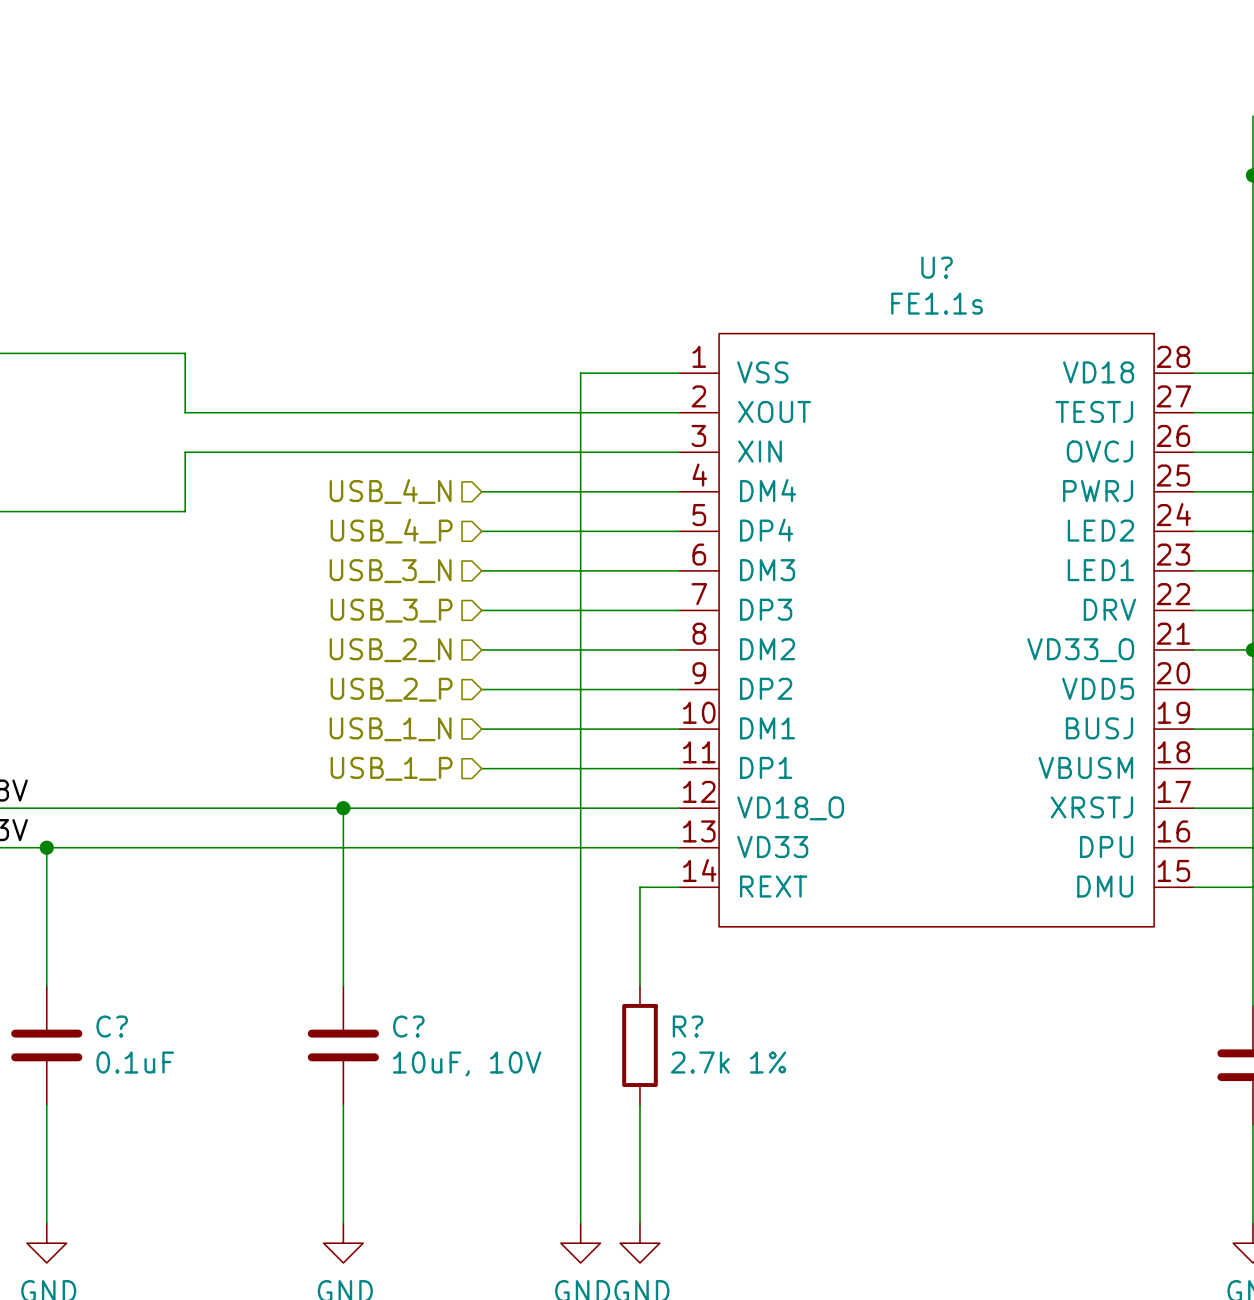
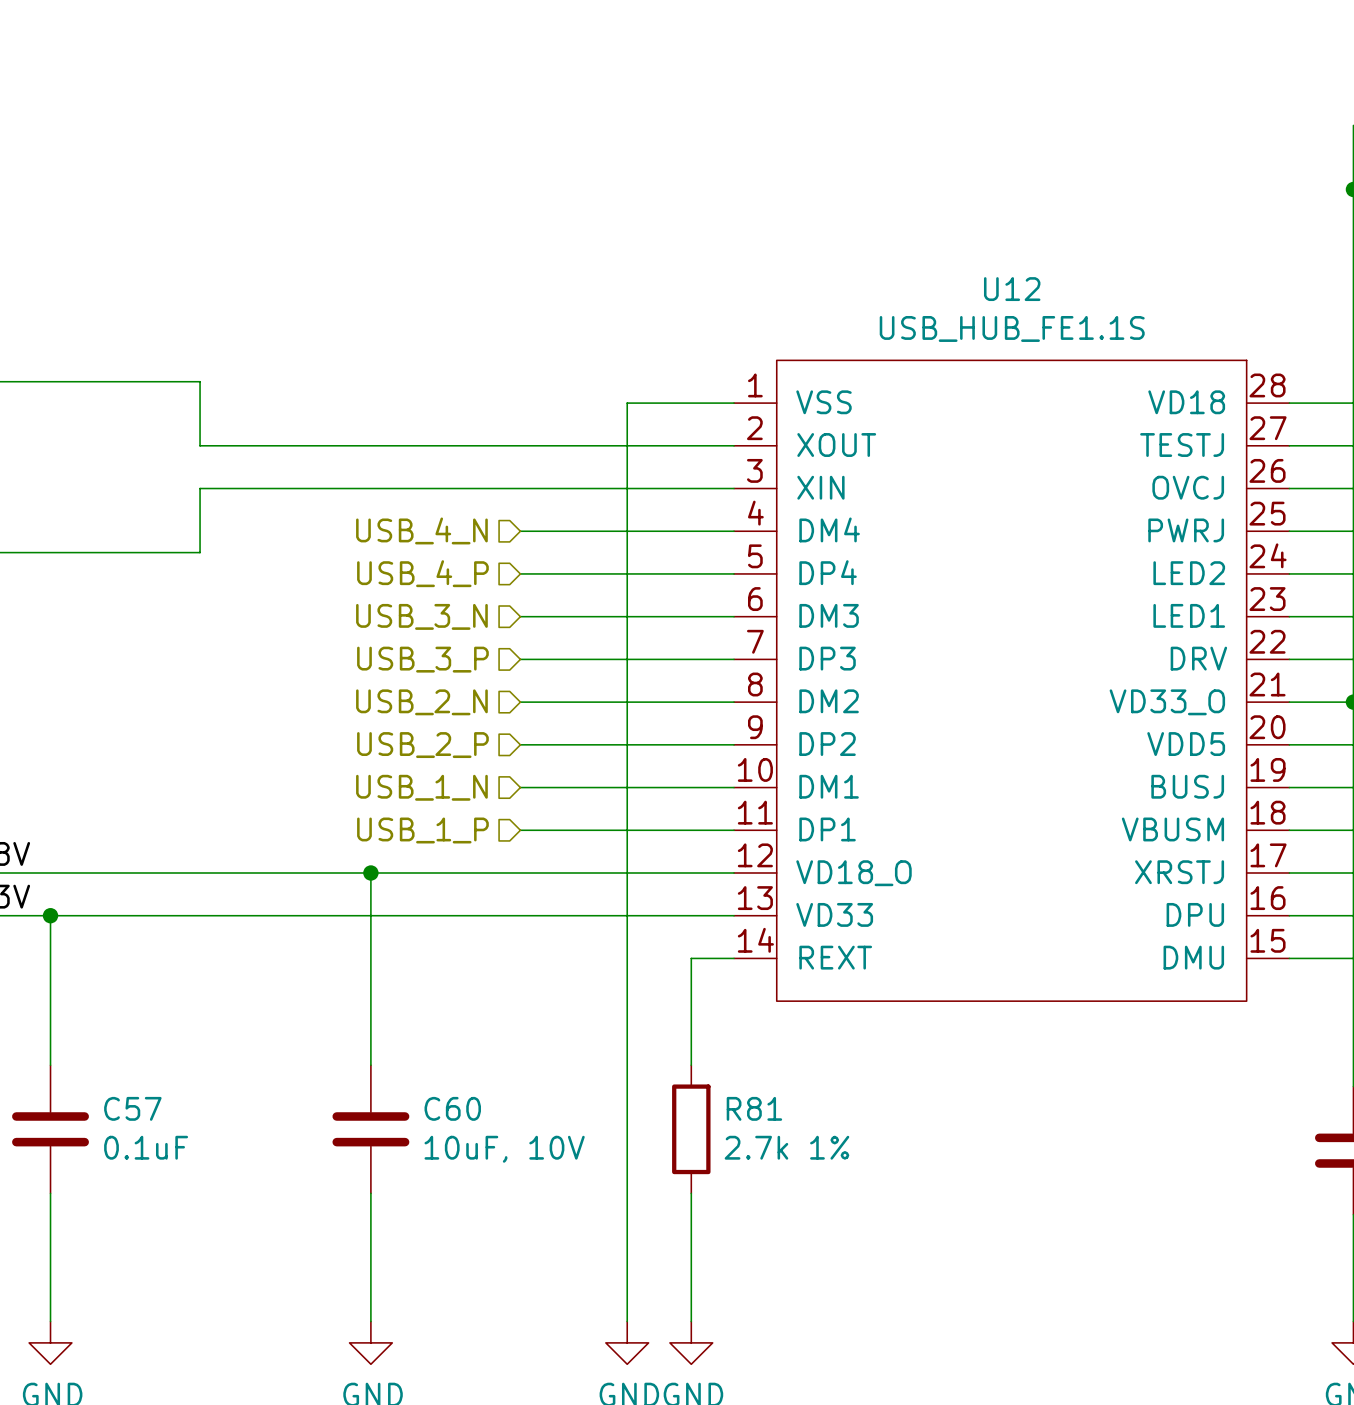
U? name: U? (937, 267) -> U12 (1012, 289)
U? value: FE1.1s (937, 303) -> USB_HUB_FE1.1S (1012, 328)
C? name: C? (112, 1026) -> C57 (132, 1108)
C? name: C? (408, 1026) -> C60 (452, 1108)
R? name: R? (688, 1026) -> R81 (754, 1108)

